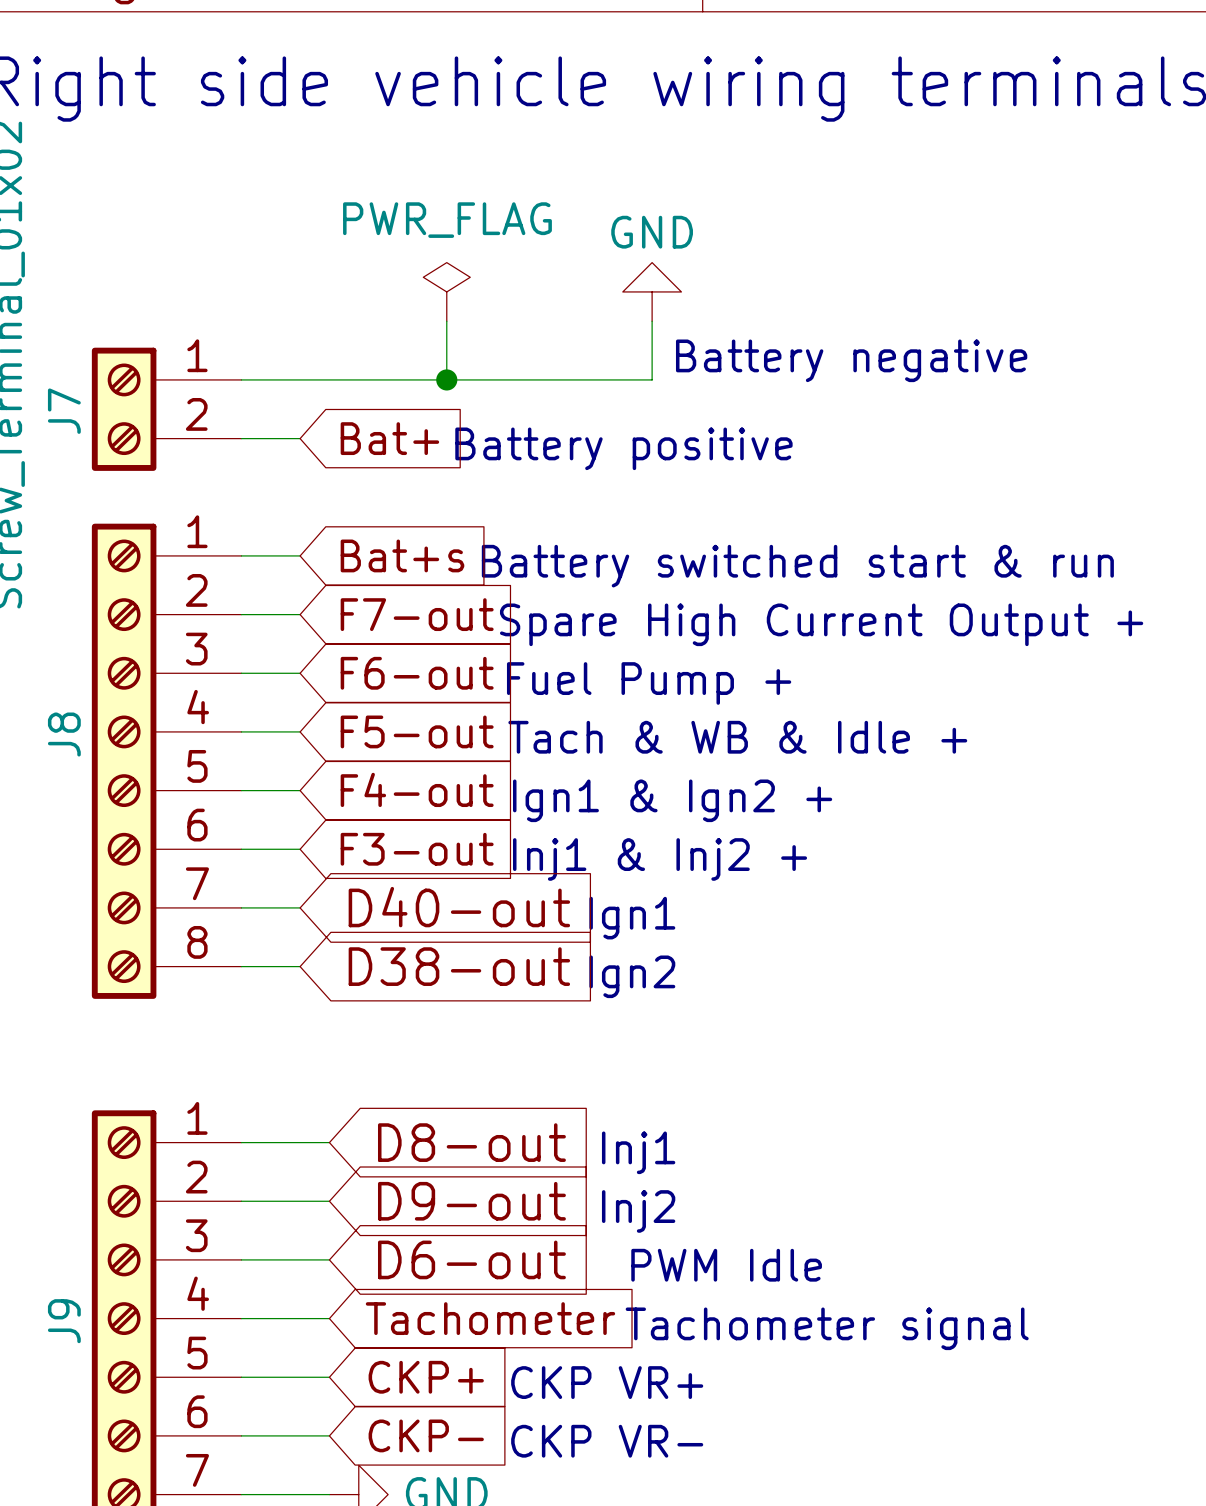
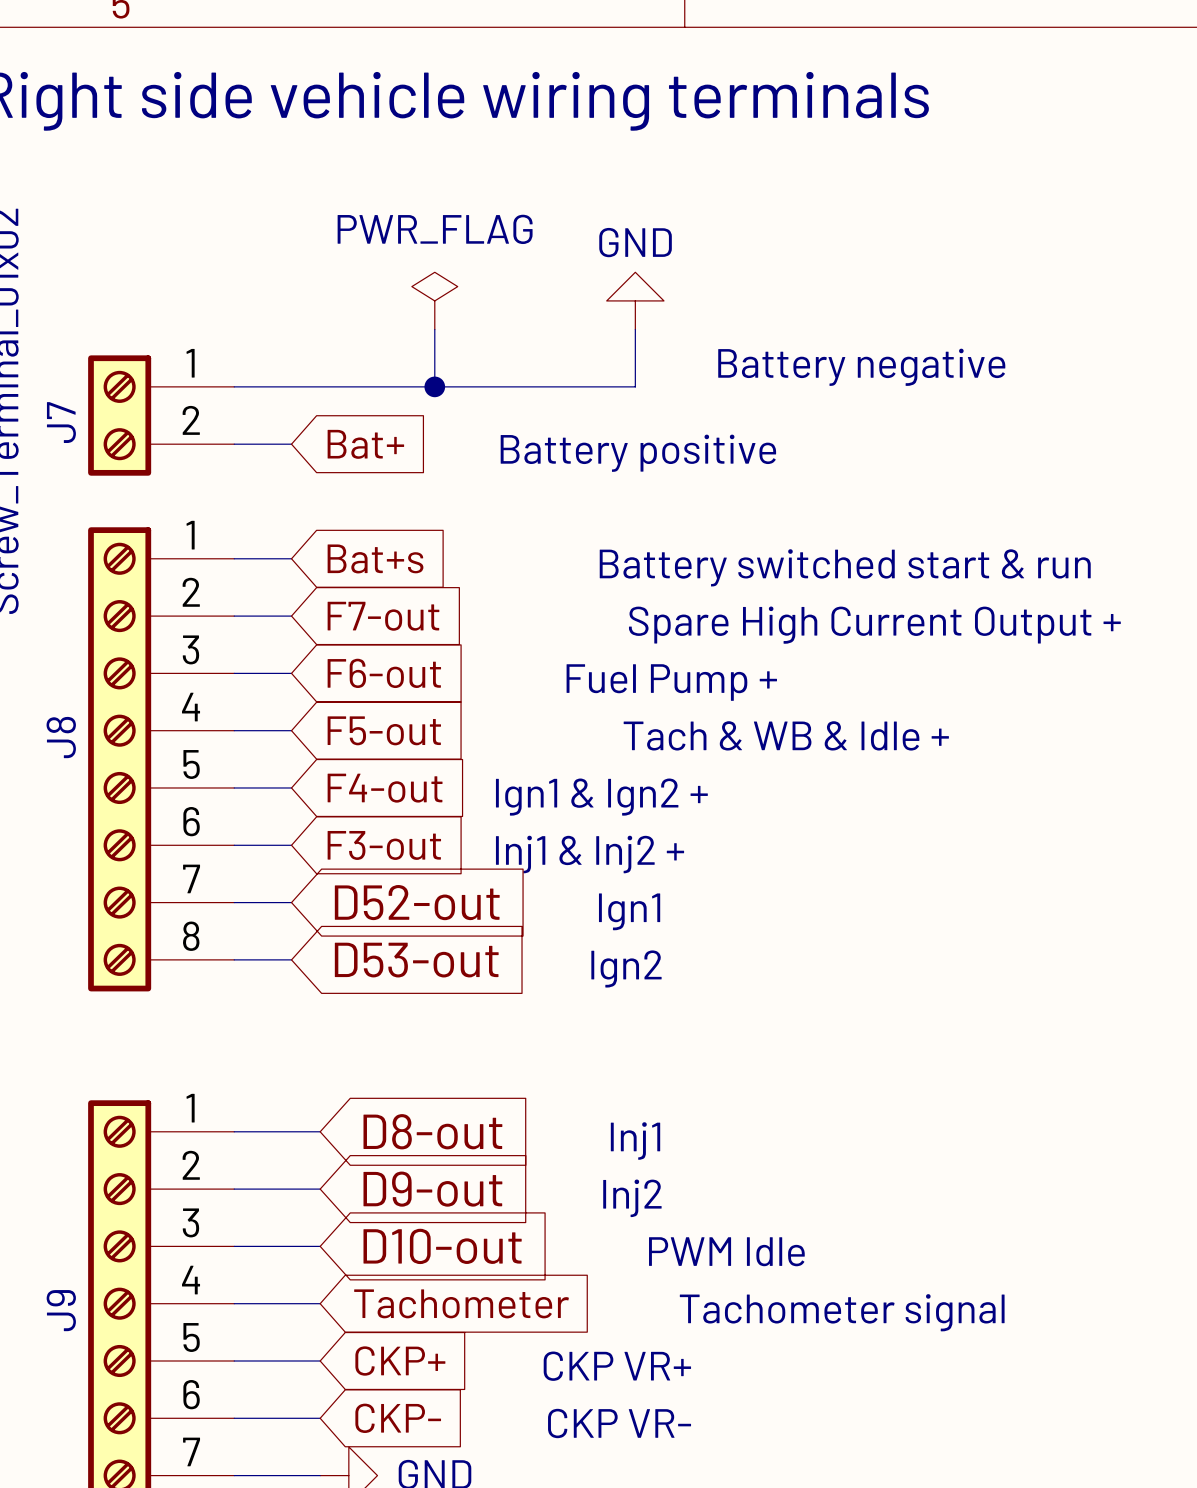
global label: D40-out (459, 907) -> D52-out (417, 902)
global label: D38-out (459, 966) -> D53-out (416, 960)
global label: D6-out (471, 1259) -> D10-out (442, 1246)

